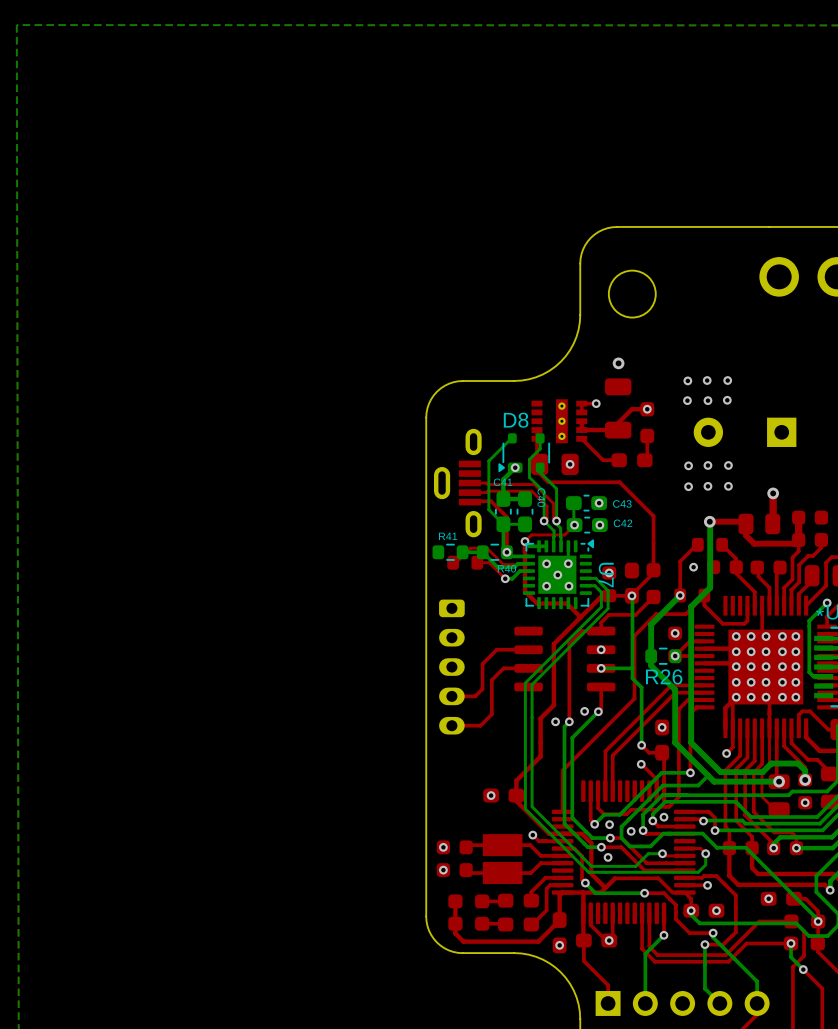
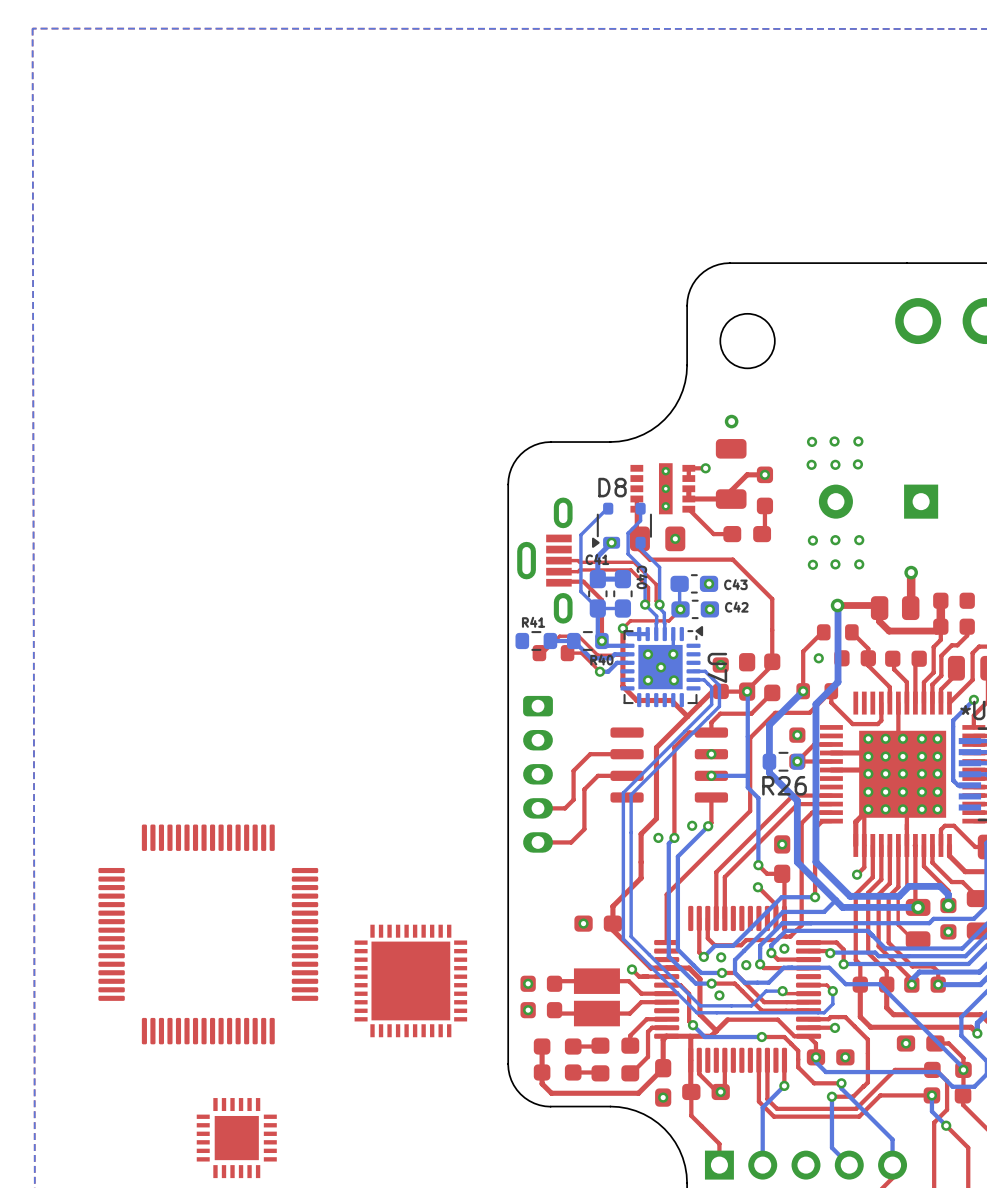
part: none -> (208, 934)
part: none -> (410, 980)
part: none -> (236, 1138)

